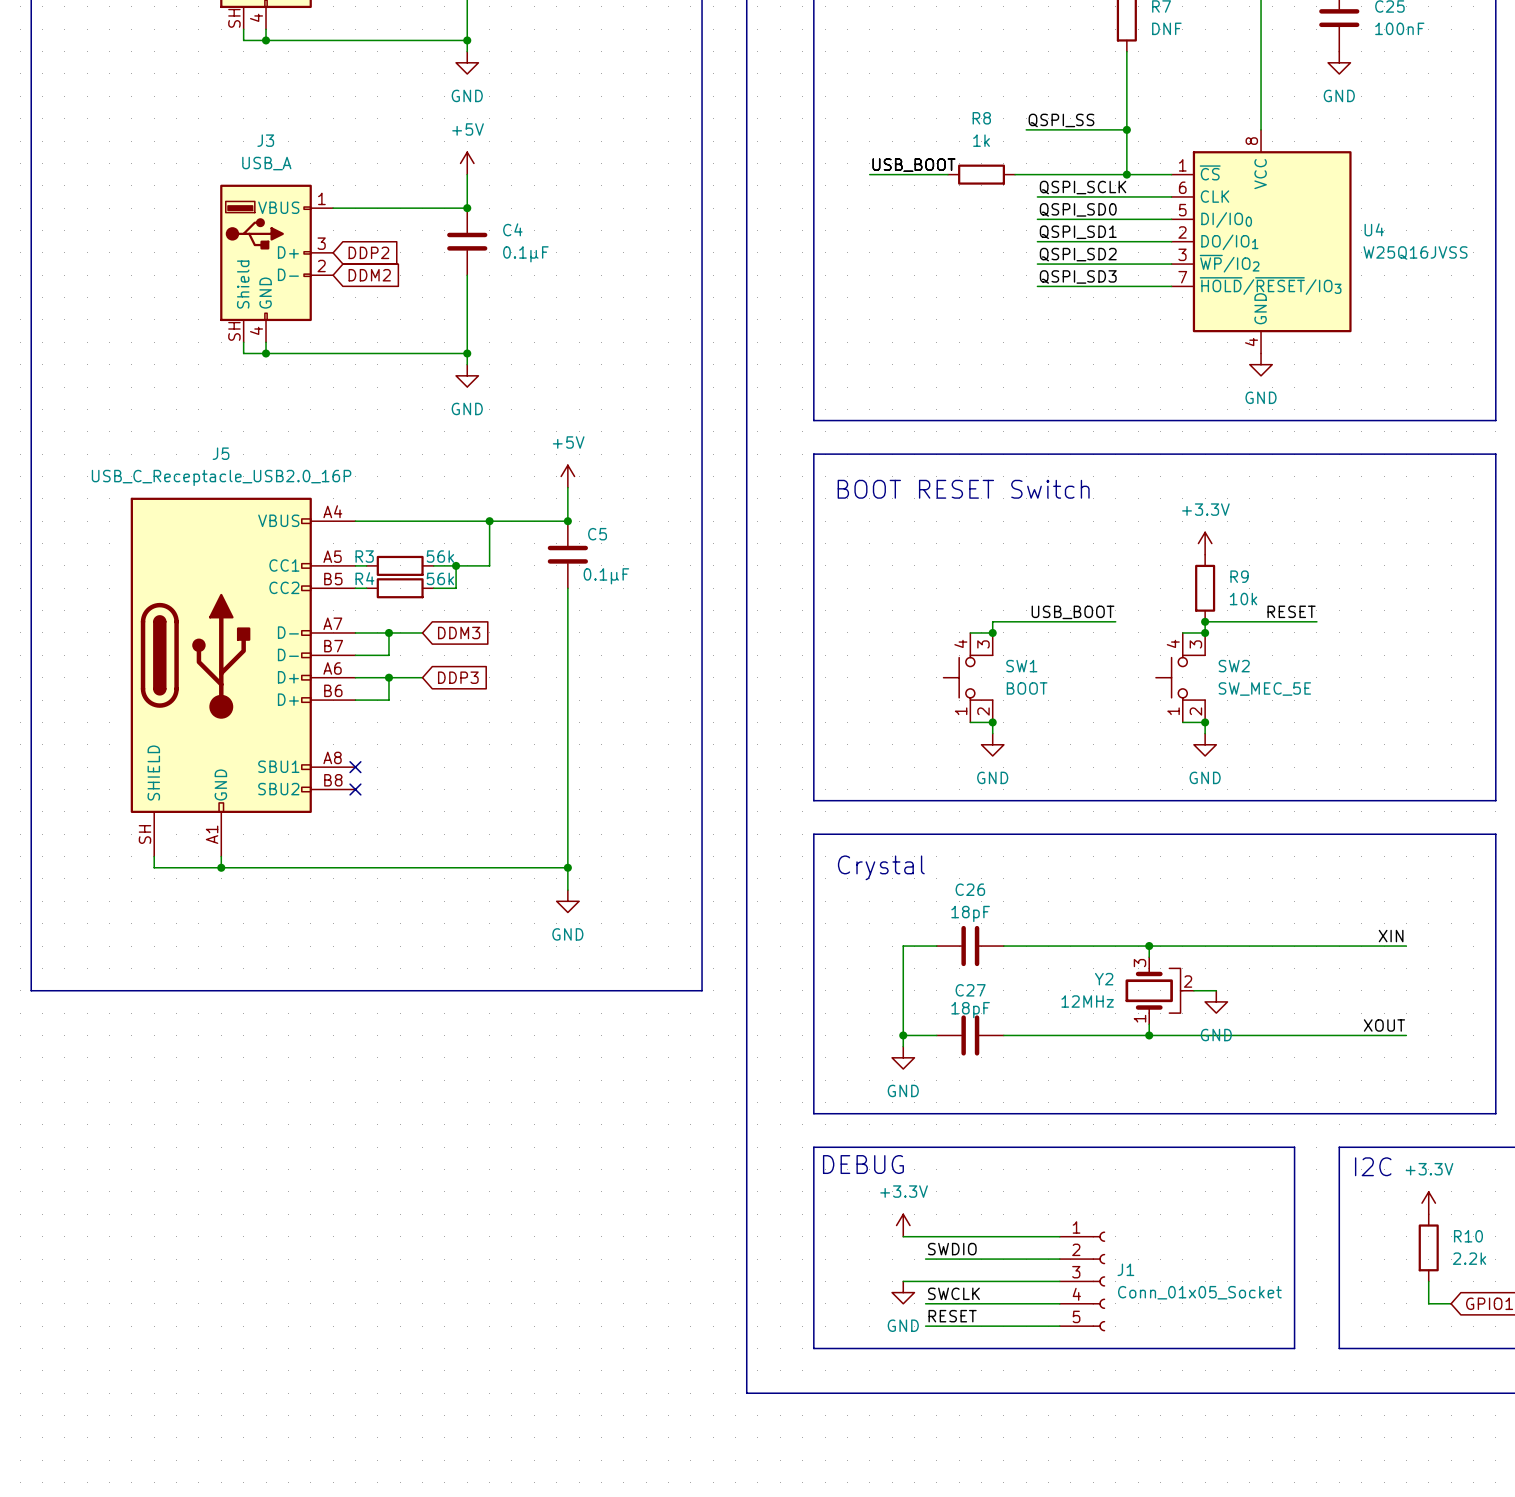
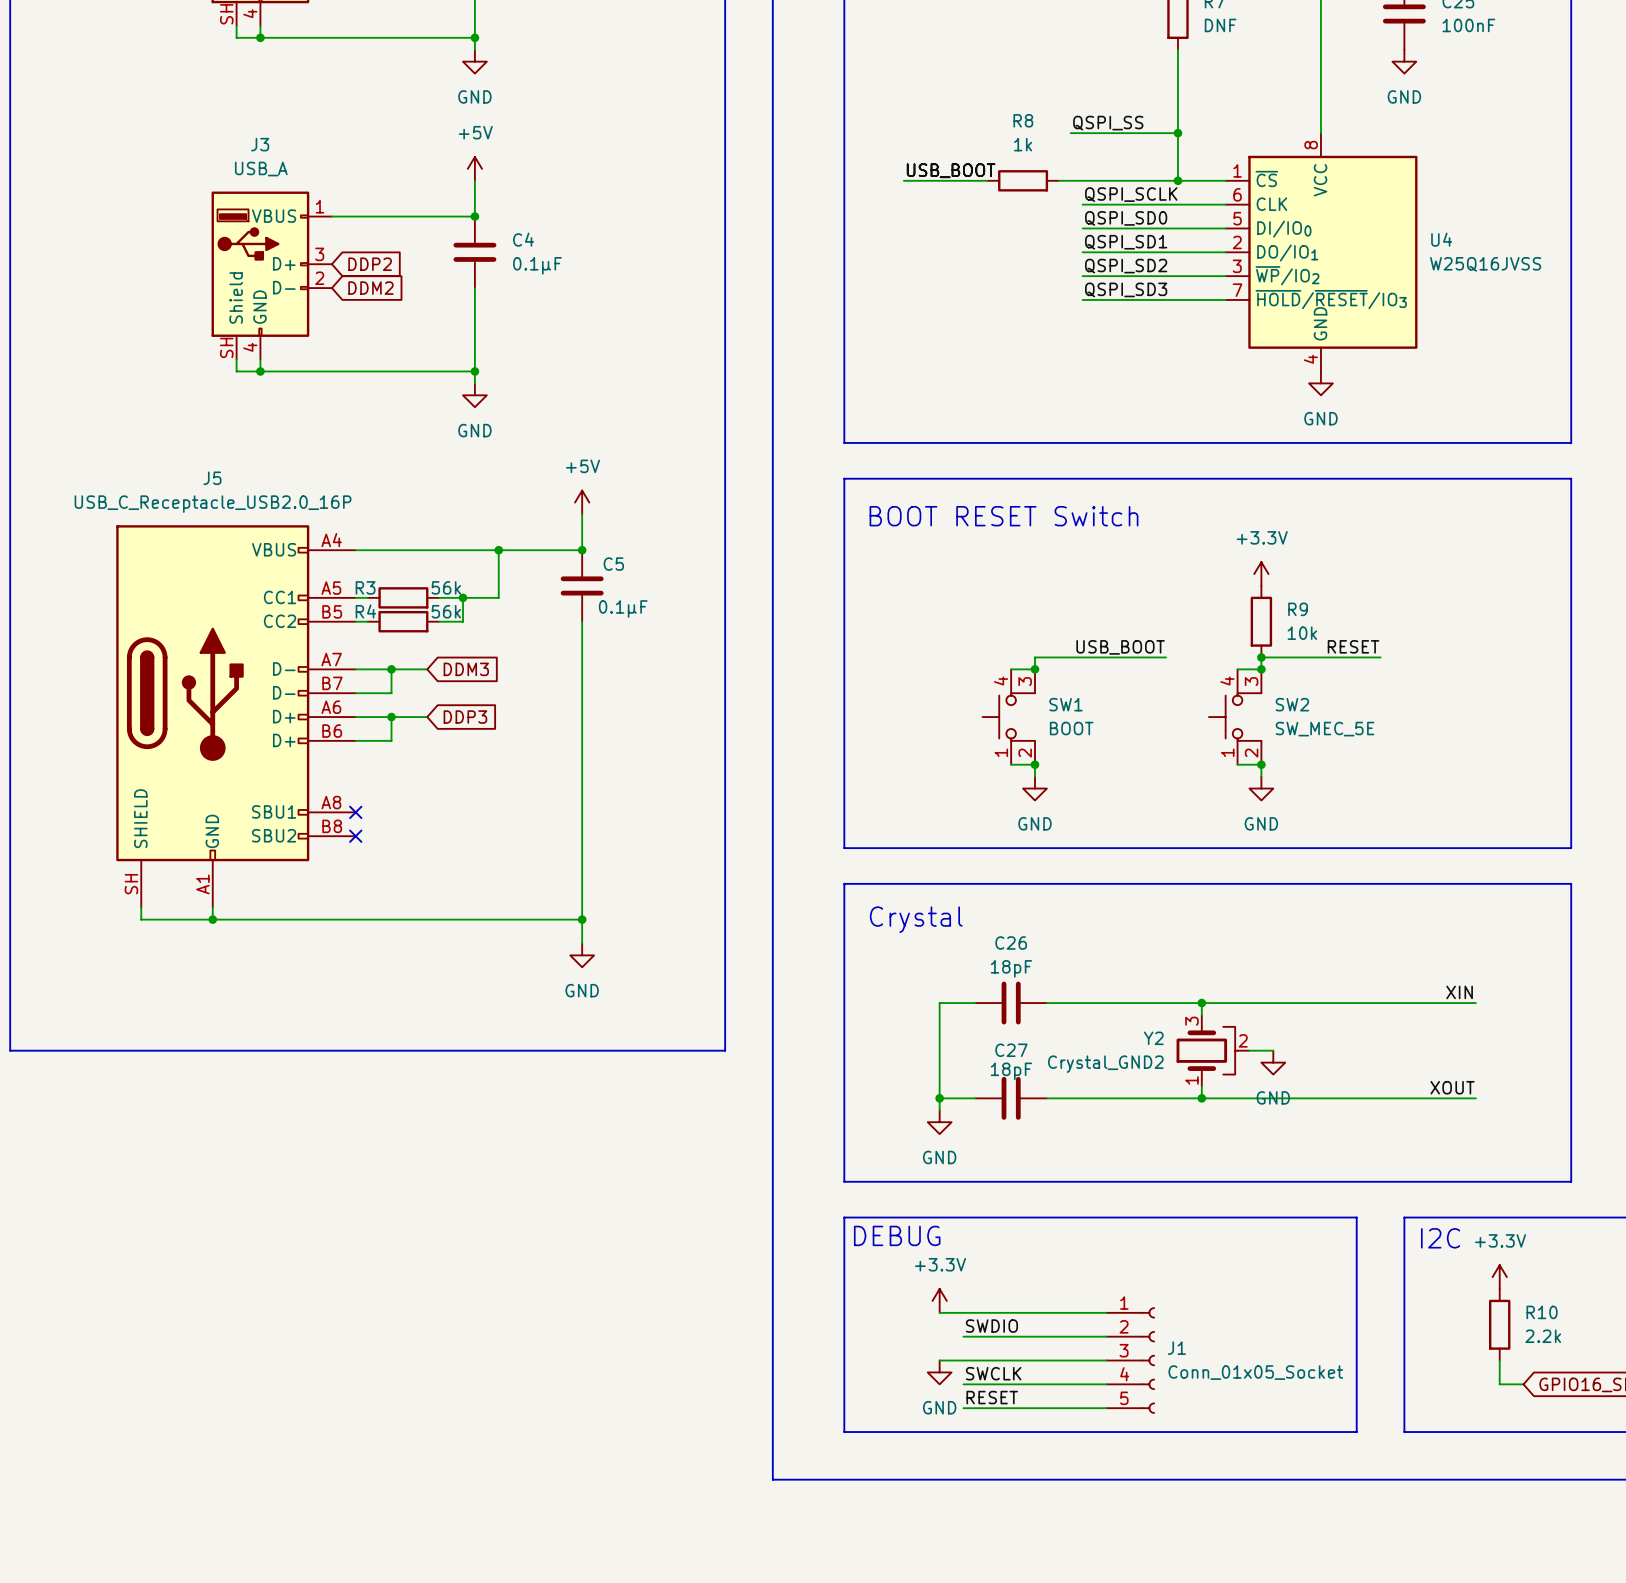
Y2 value: 12MHz (1087, 1001) -> Crystal_GND2 (1105, 1064)

